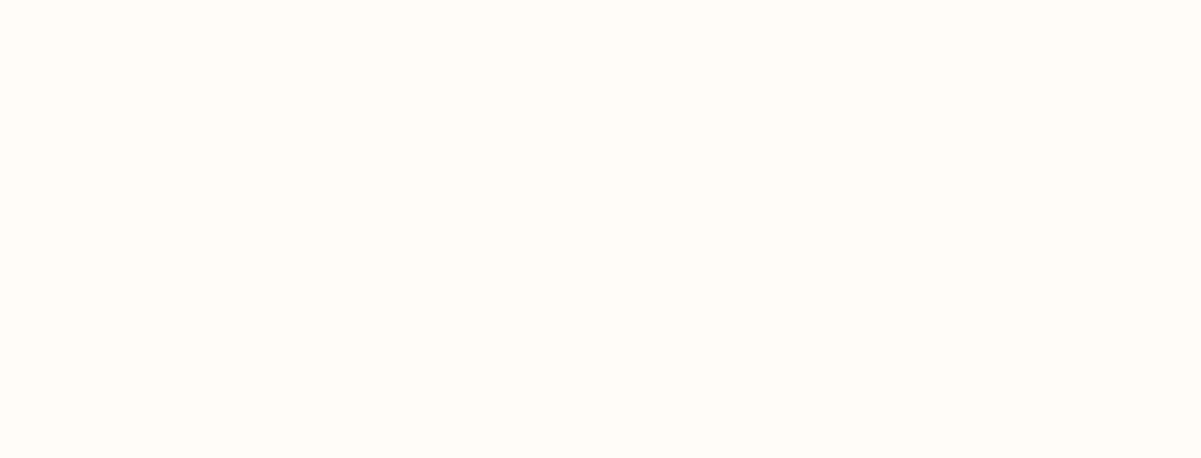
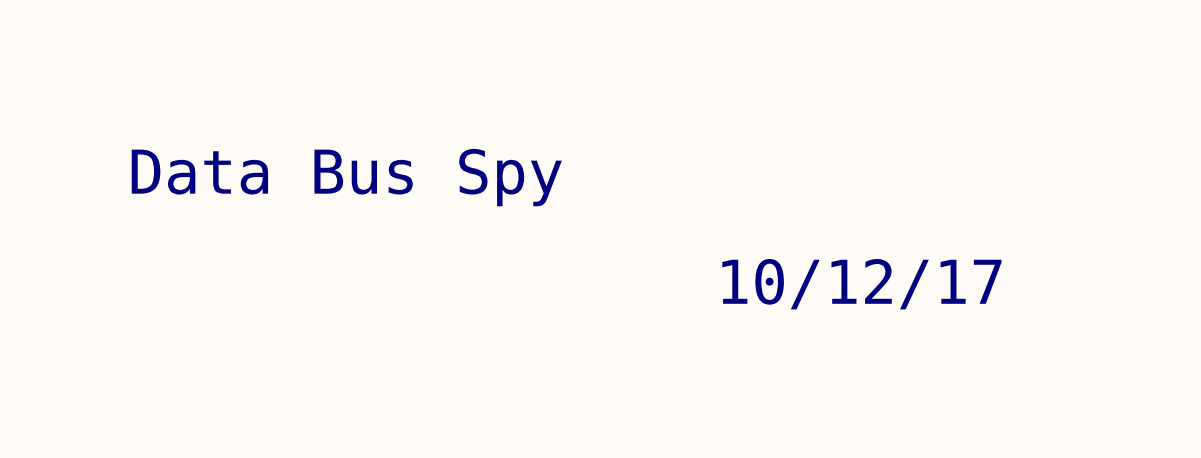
text: none -> Data Bus Spy (346, 177)
text: none -> 10/12/17 (861, 284)

